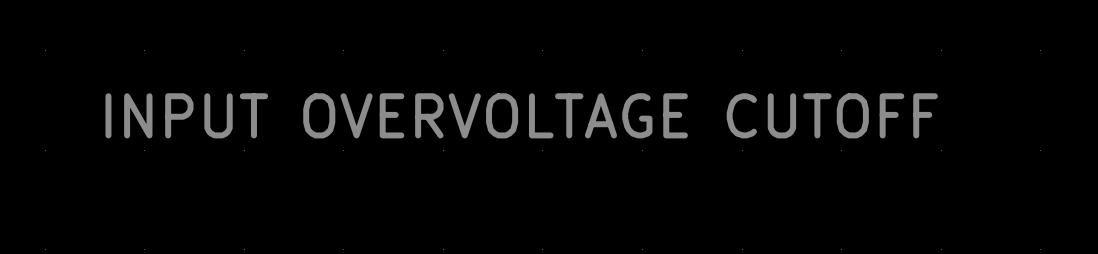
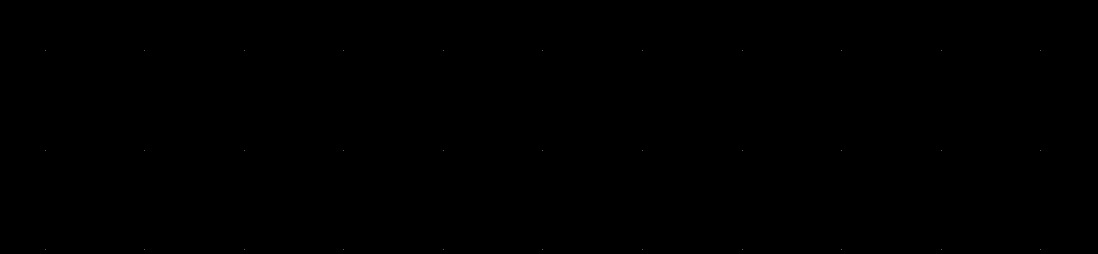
text: INPUT OVERVOLTAGE CUTOFF (521, 115) -> none

